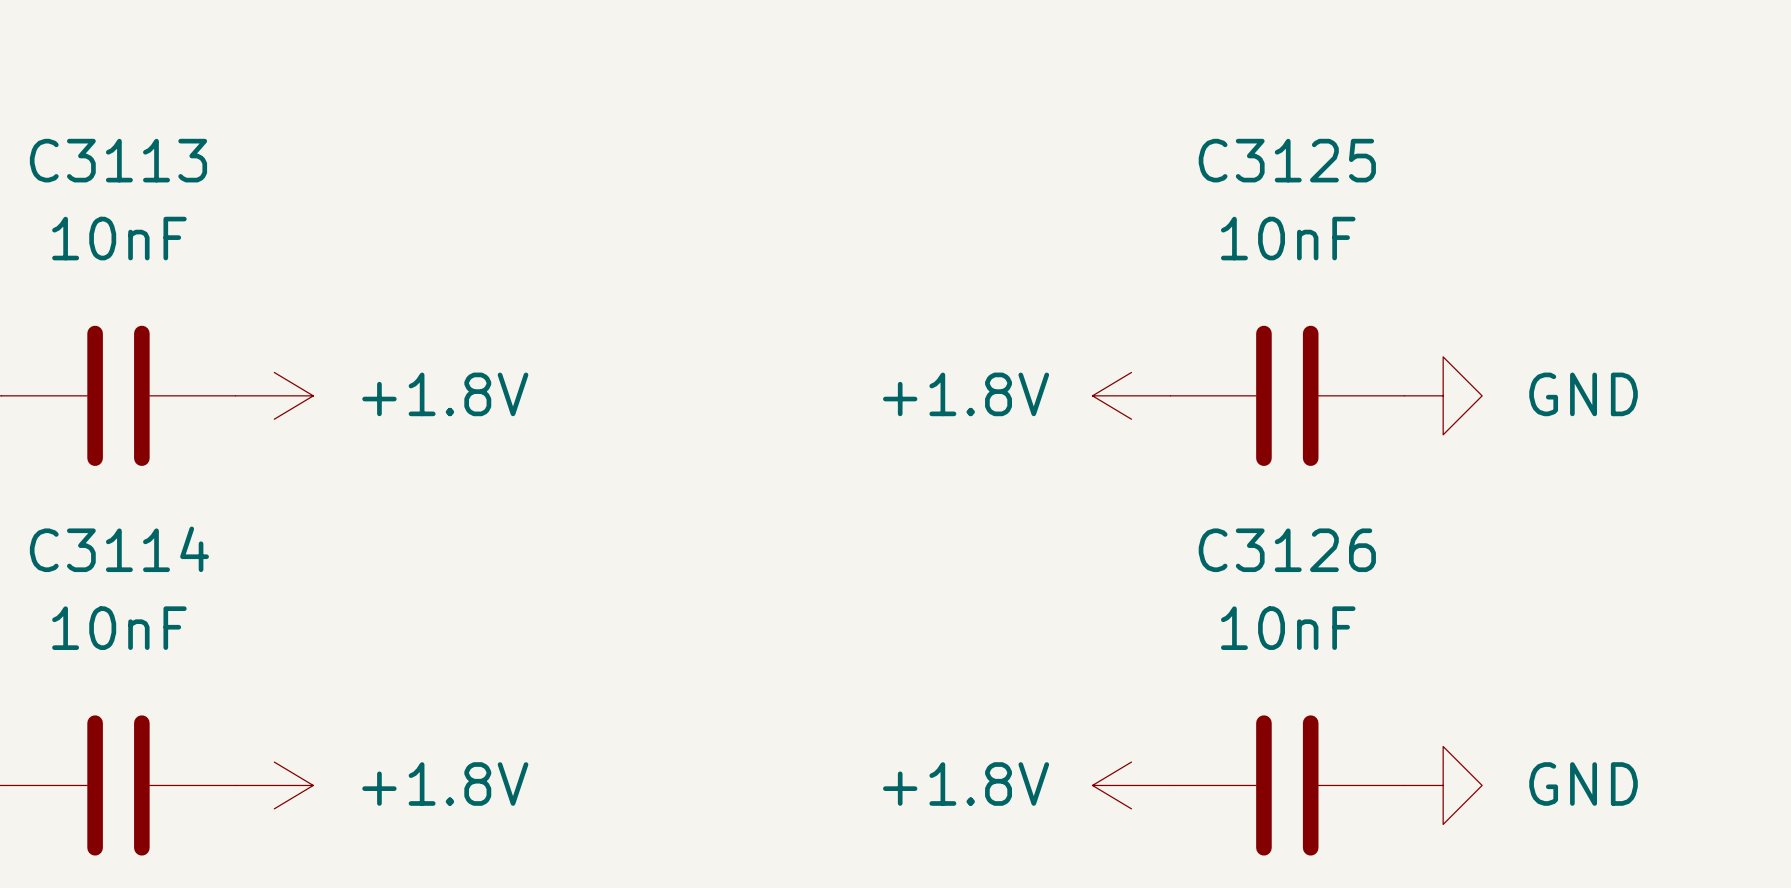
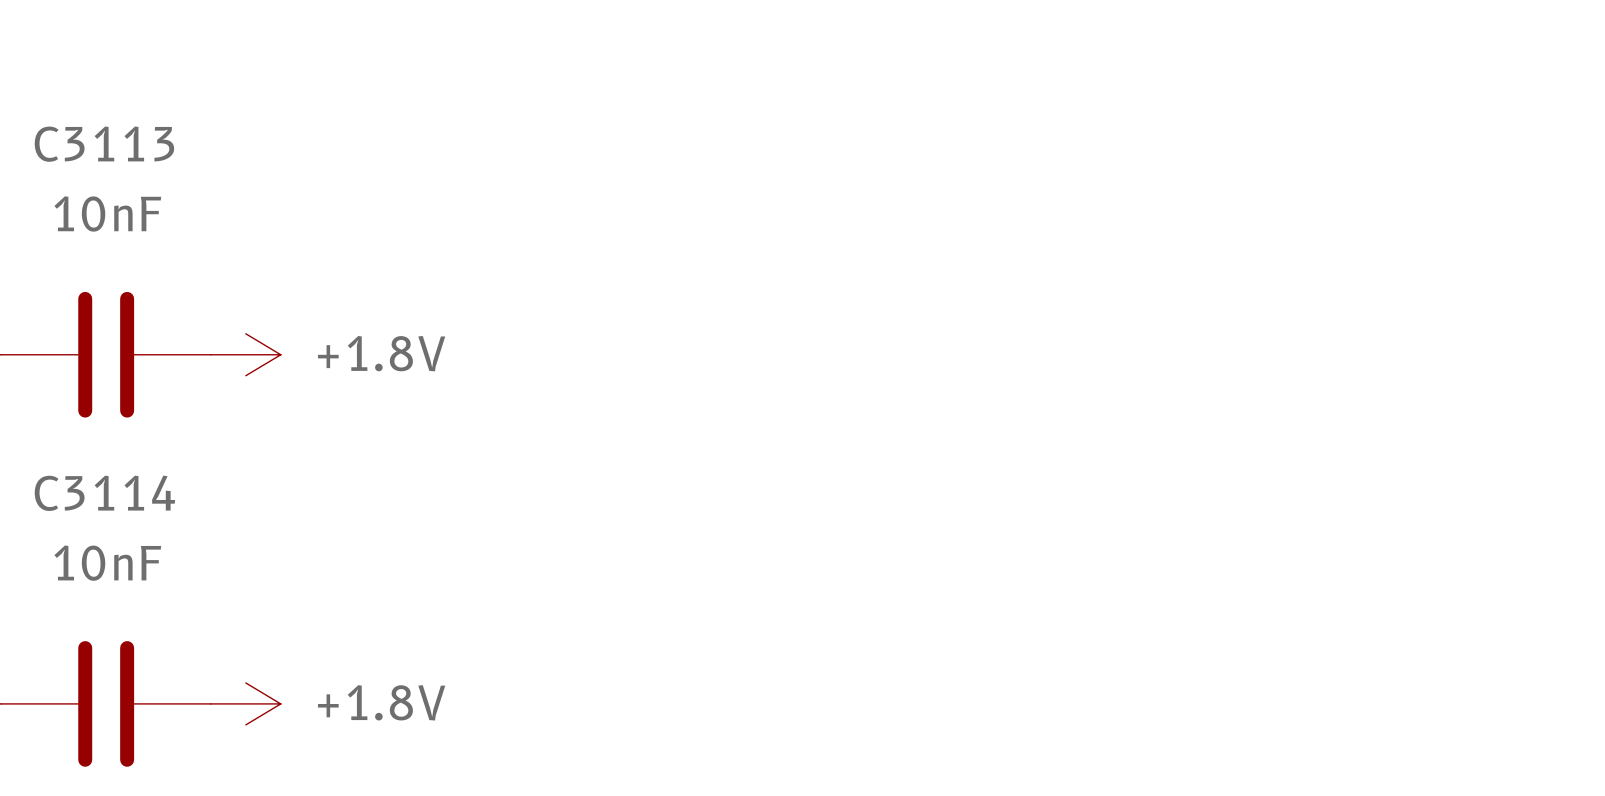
power symbol: +1.8V (1131, 395) -> none
C3125: 10nF (1287, 395) -> none
power symbol: GND (1443, 395) -> none
power symbol: +1.8V (1131, 785) -> none
C3126: 10nF (1287, 785) -> none
power symbol: GND (1443, 785) -> none

